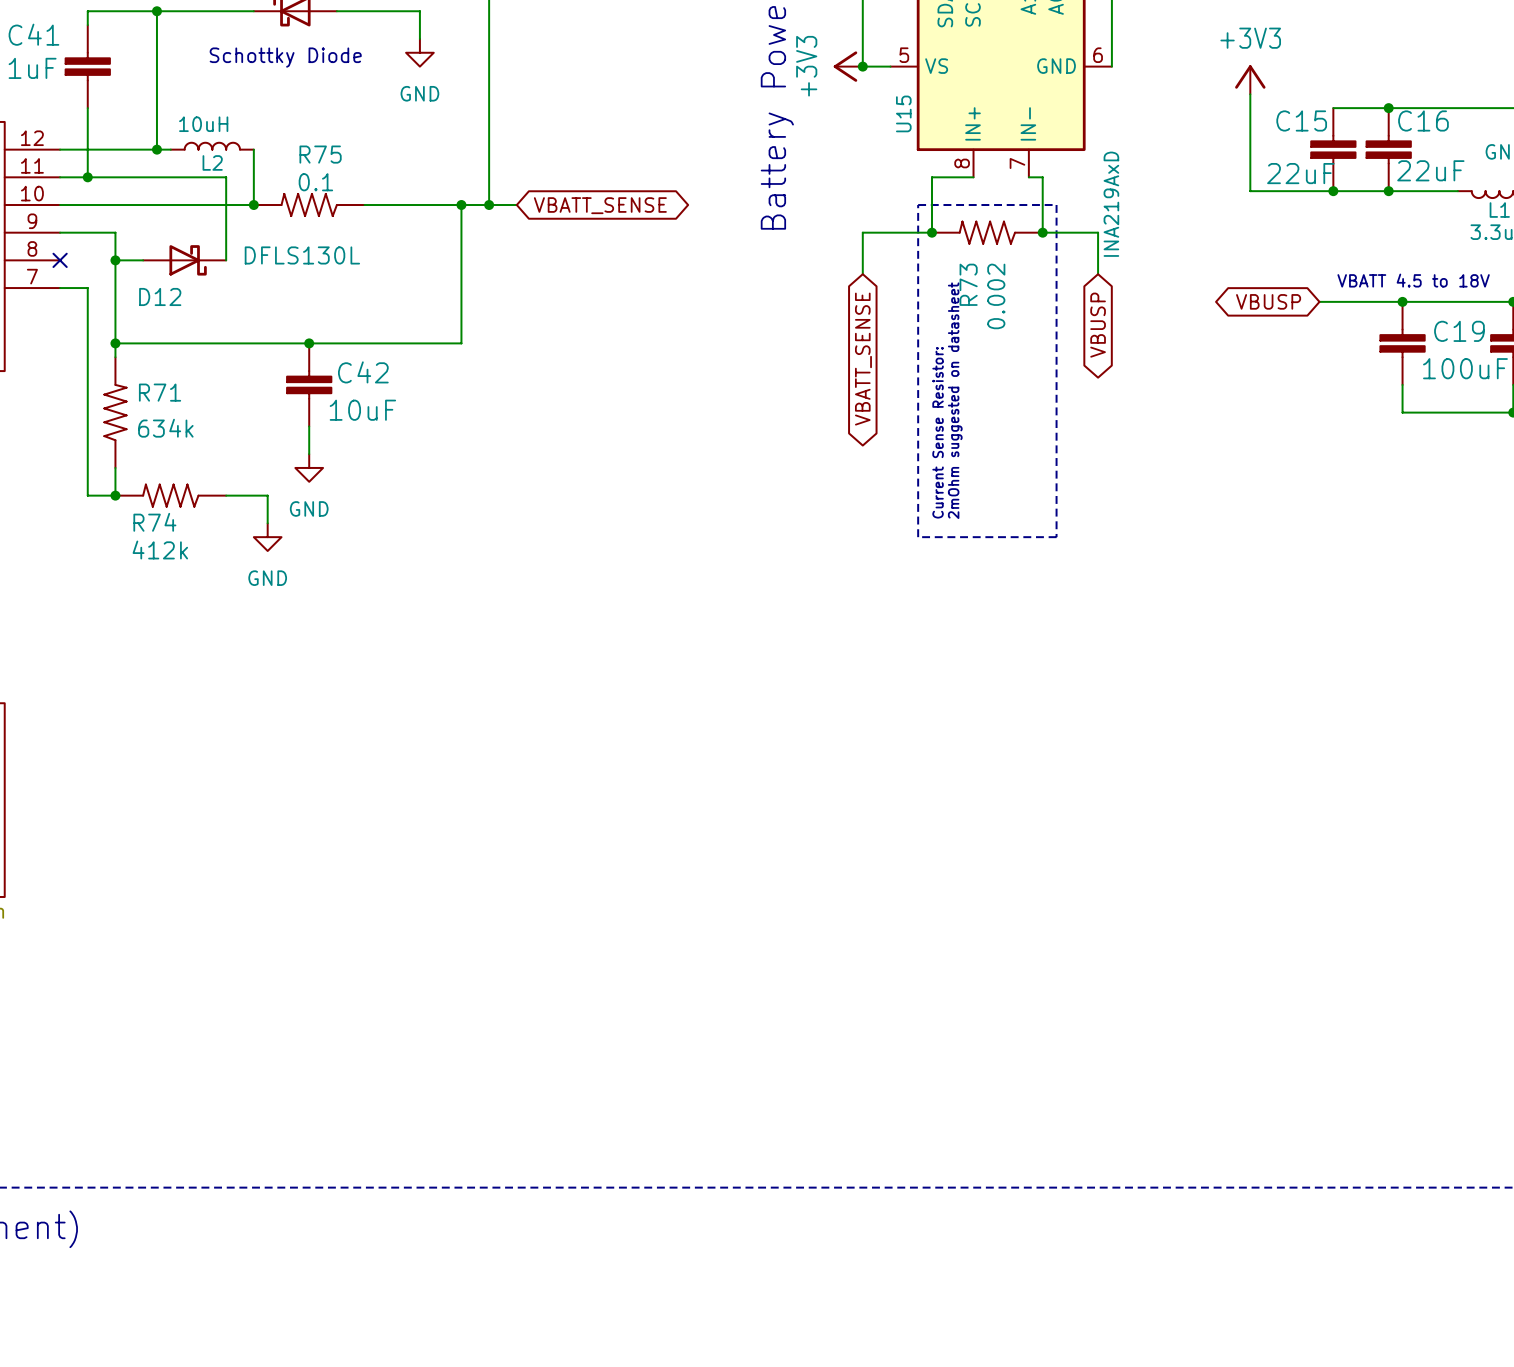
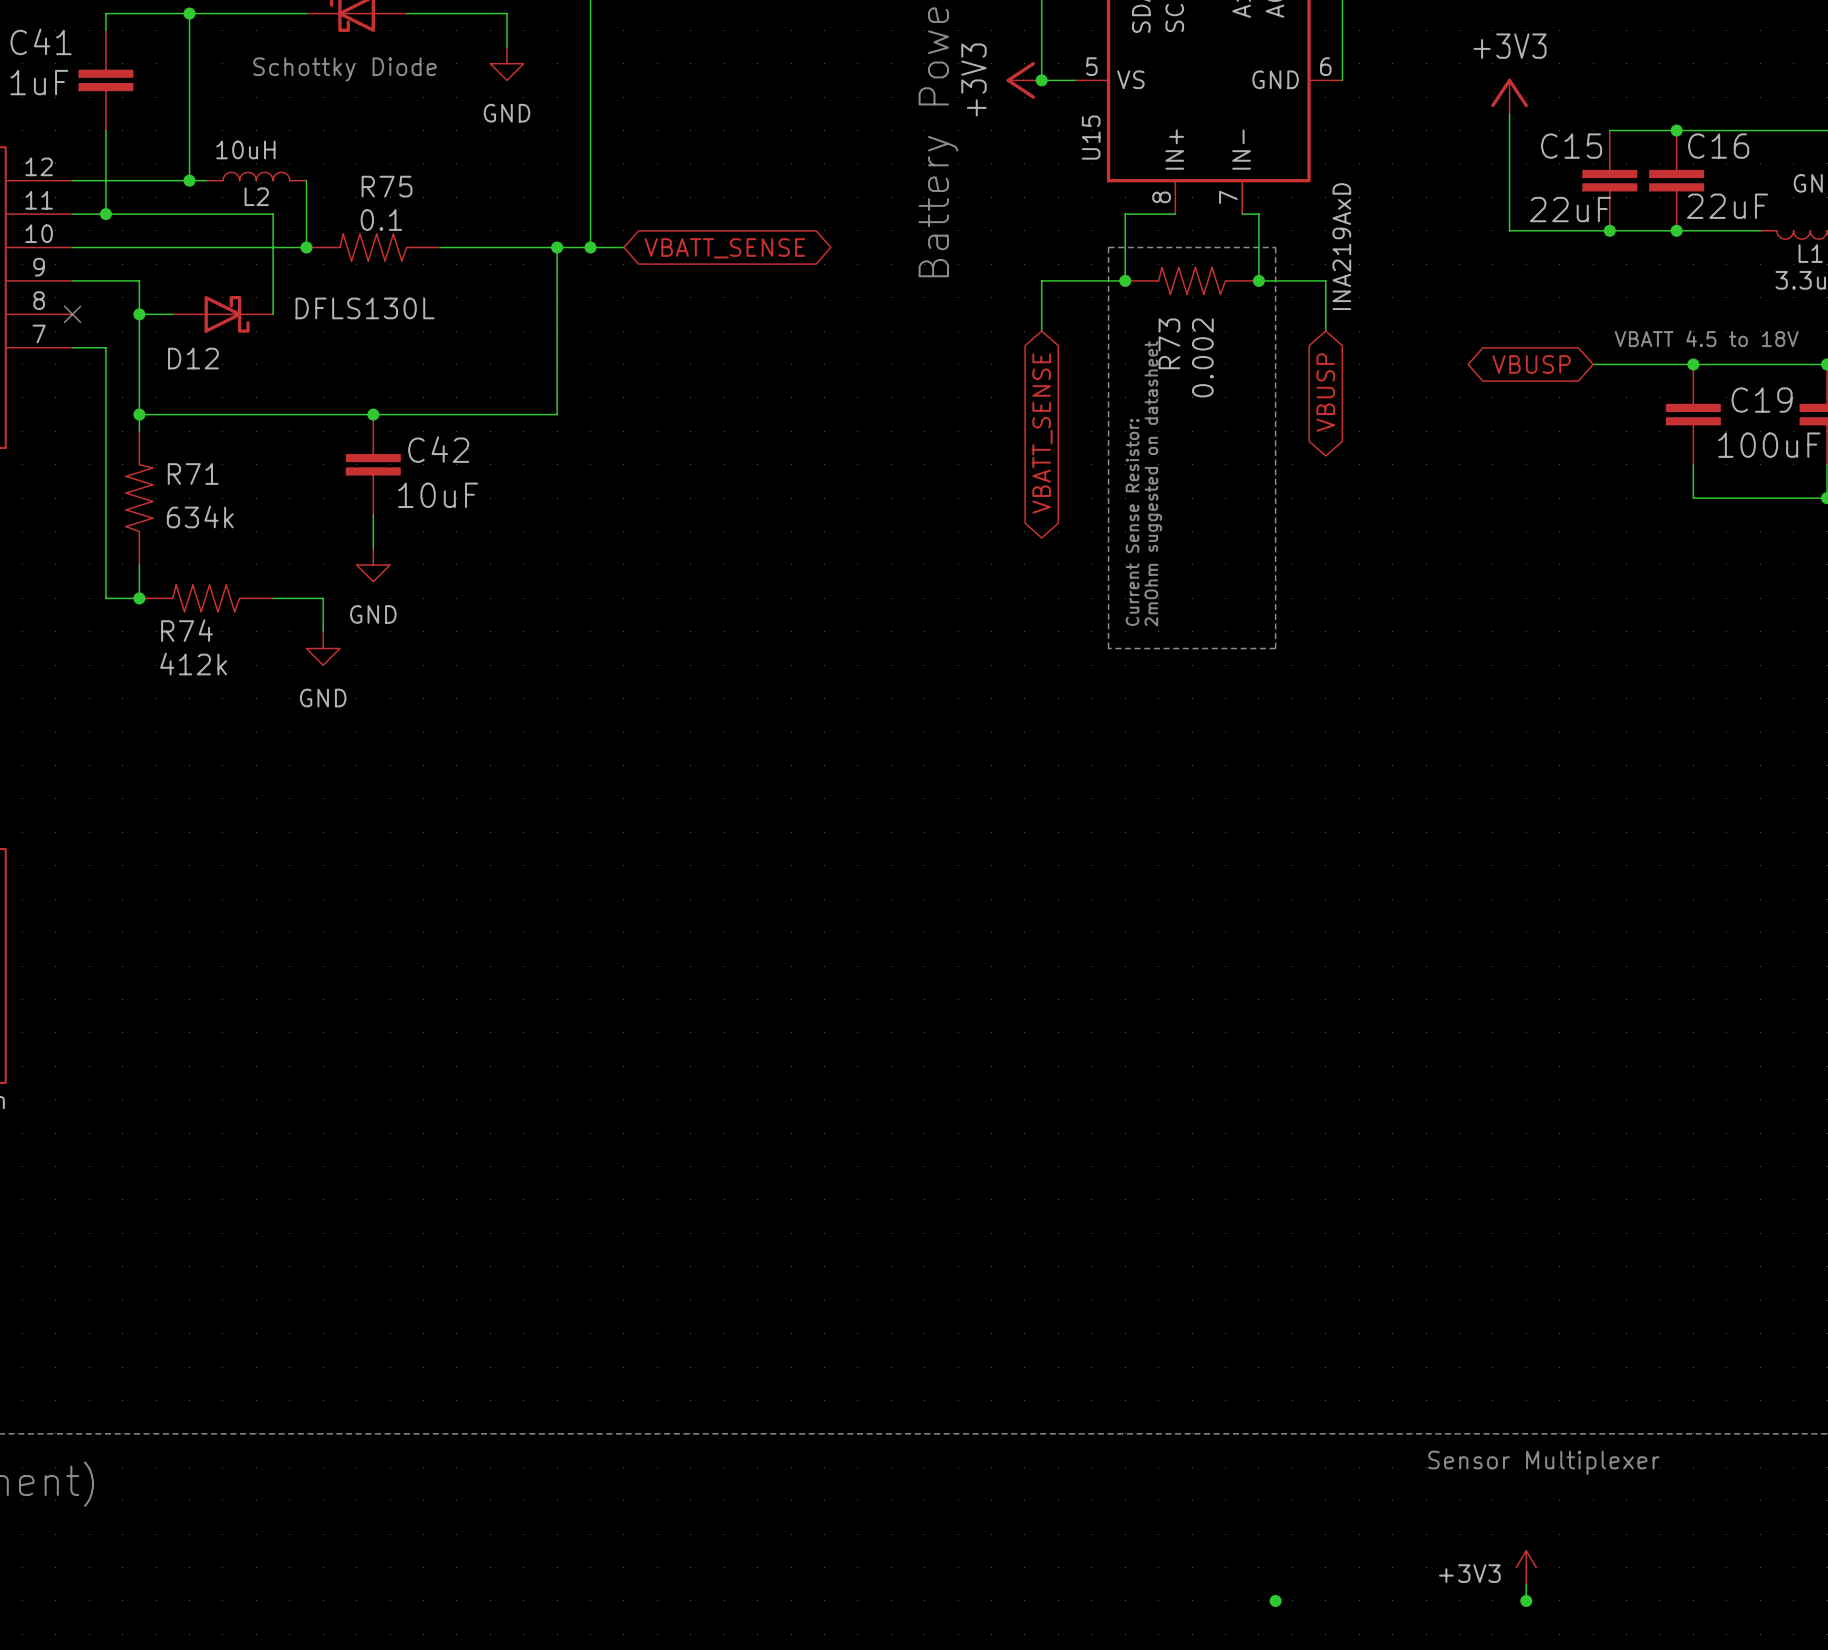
text: none -> Sensor Multiplexer (1543, 1462)
power symbol: none -> +3V3 (1526, 1567)
wire: none -> (1526, 1584) (1526, 1600)
junction: none -> (1275, 1600)
junction: none -> (1526, 1600)

